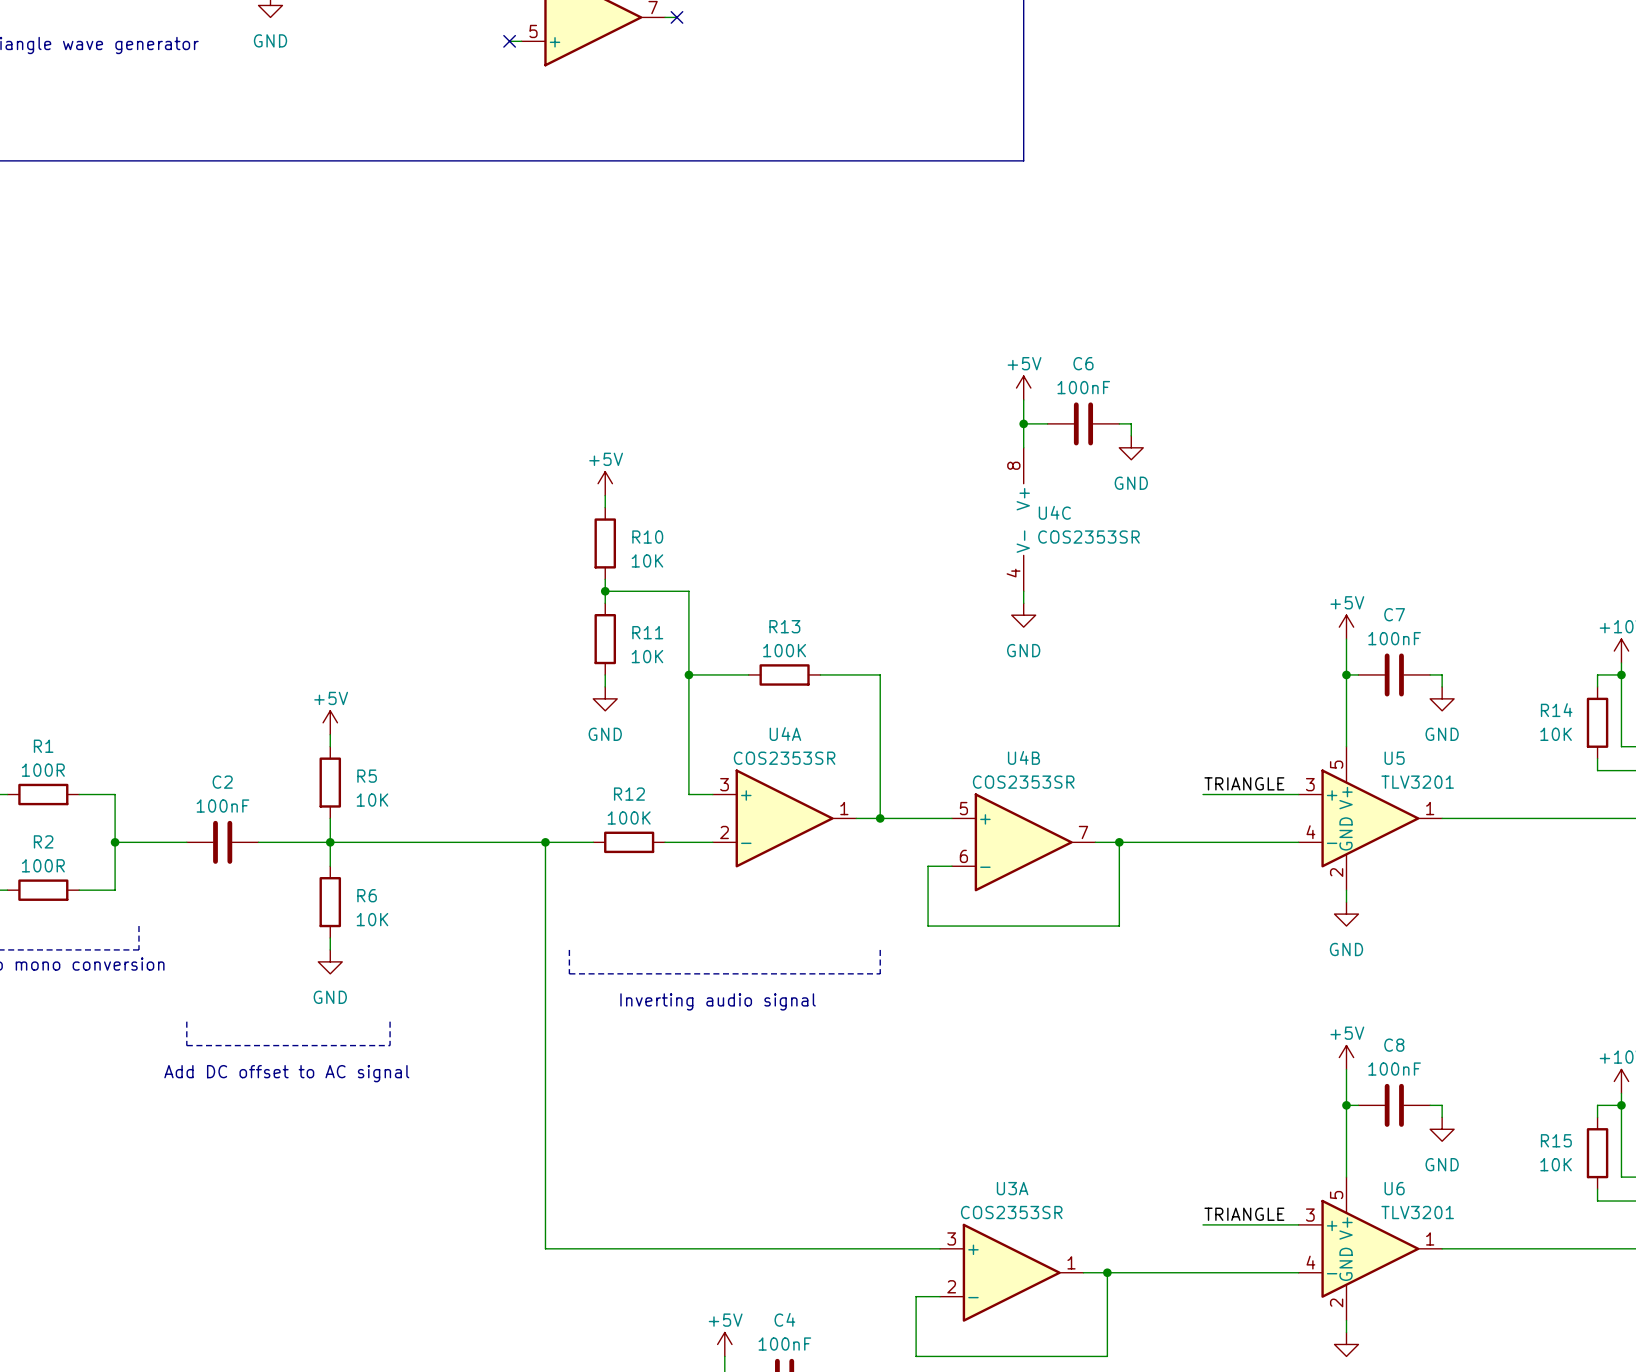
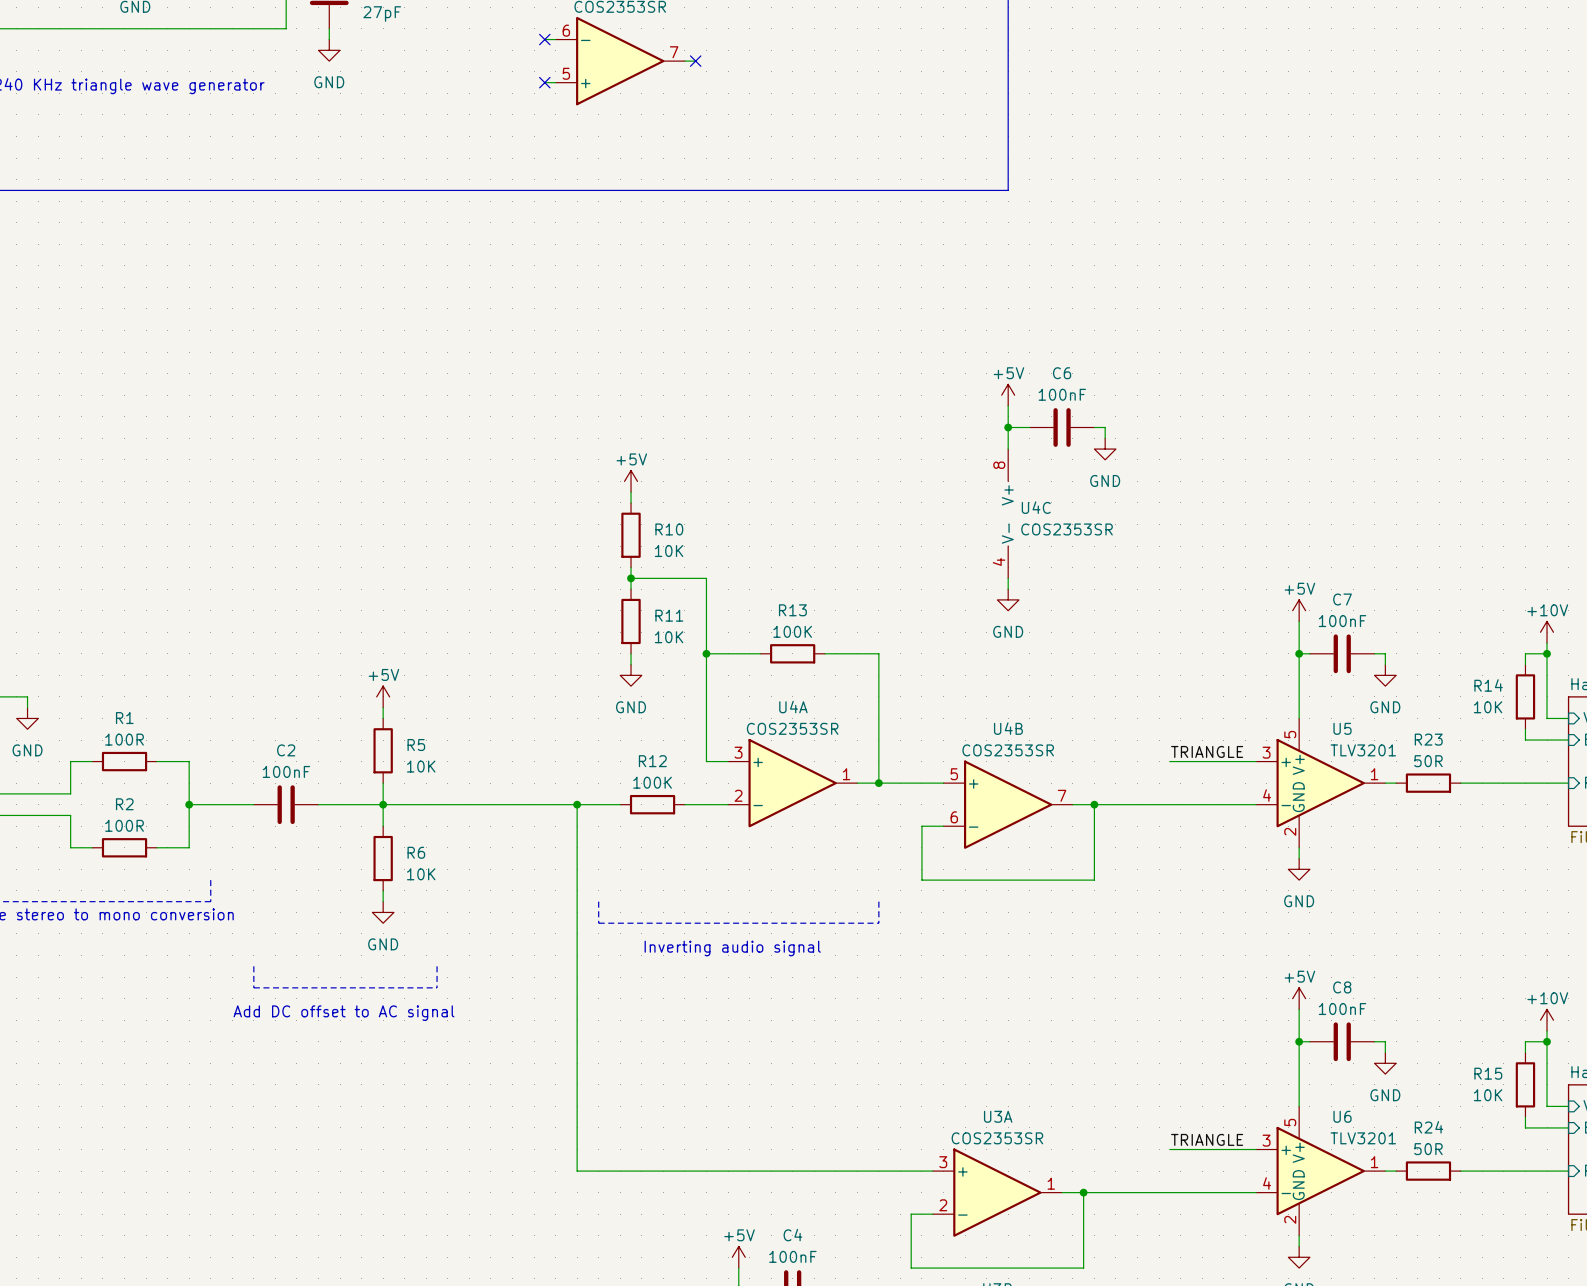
wire: (1454, 818) (1525, 818) -> none
R23: none -> 50R (1428, 783)
wire: (1454, 1248) (1525, 1248) -> none
R24: none -> 50R (1428, 1171)

